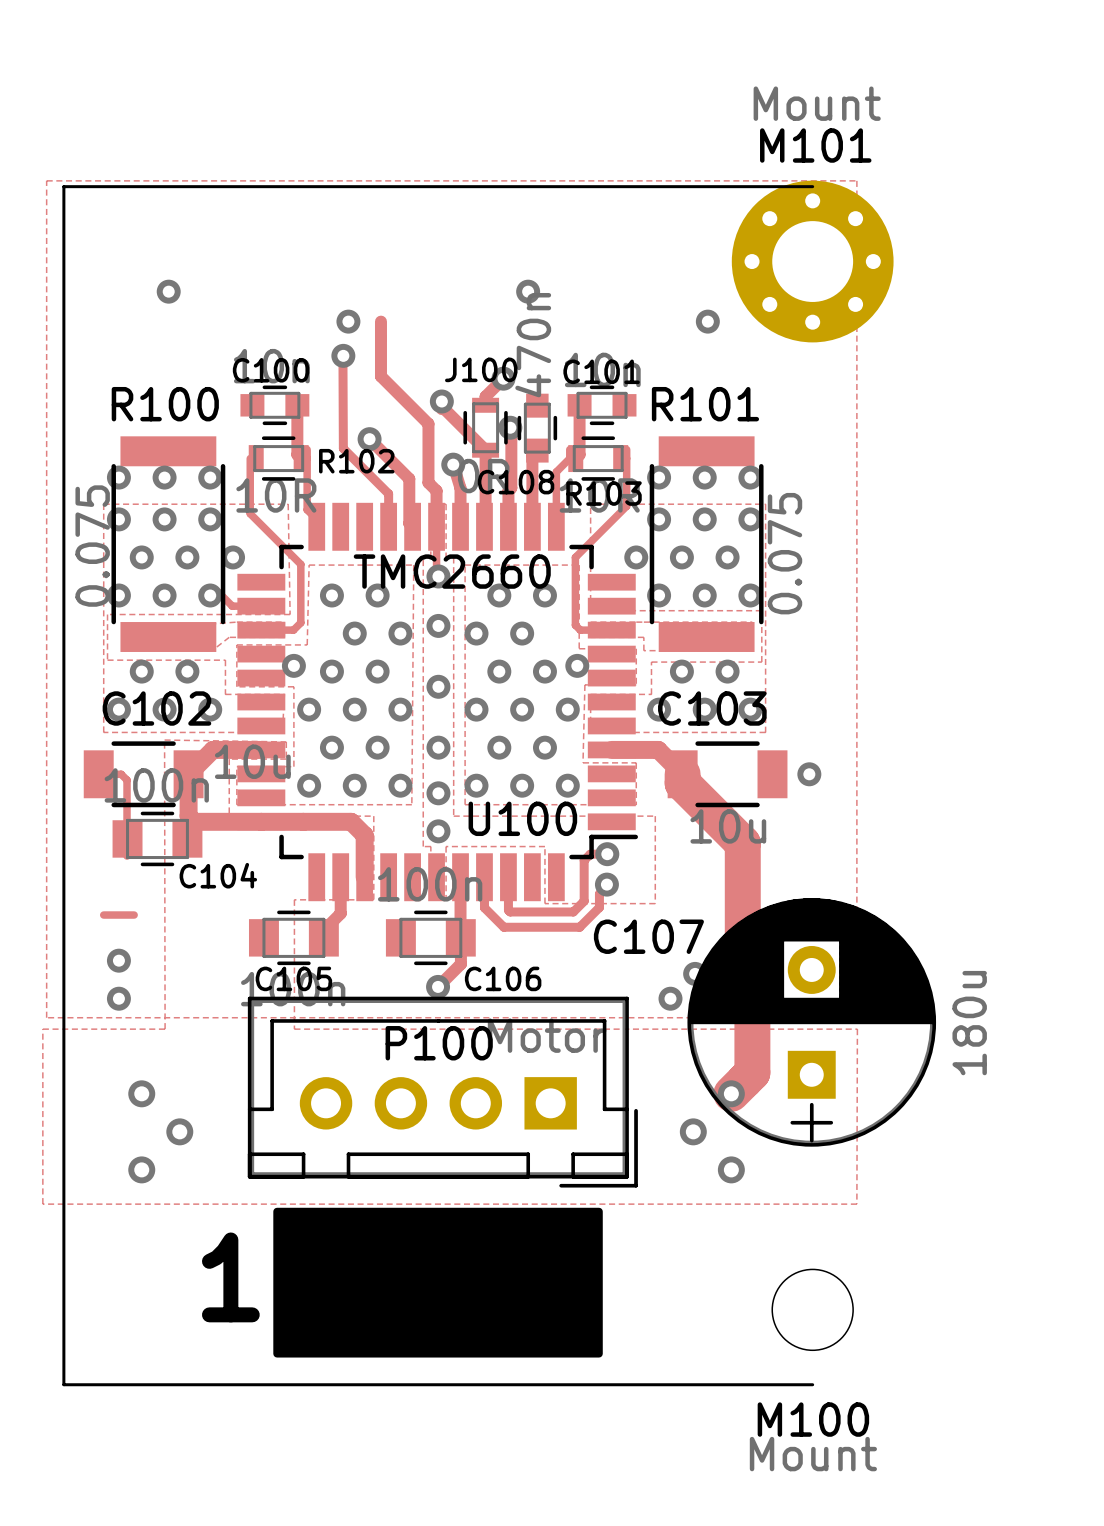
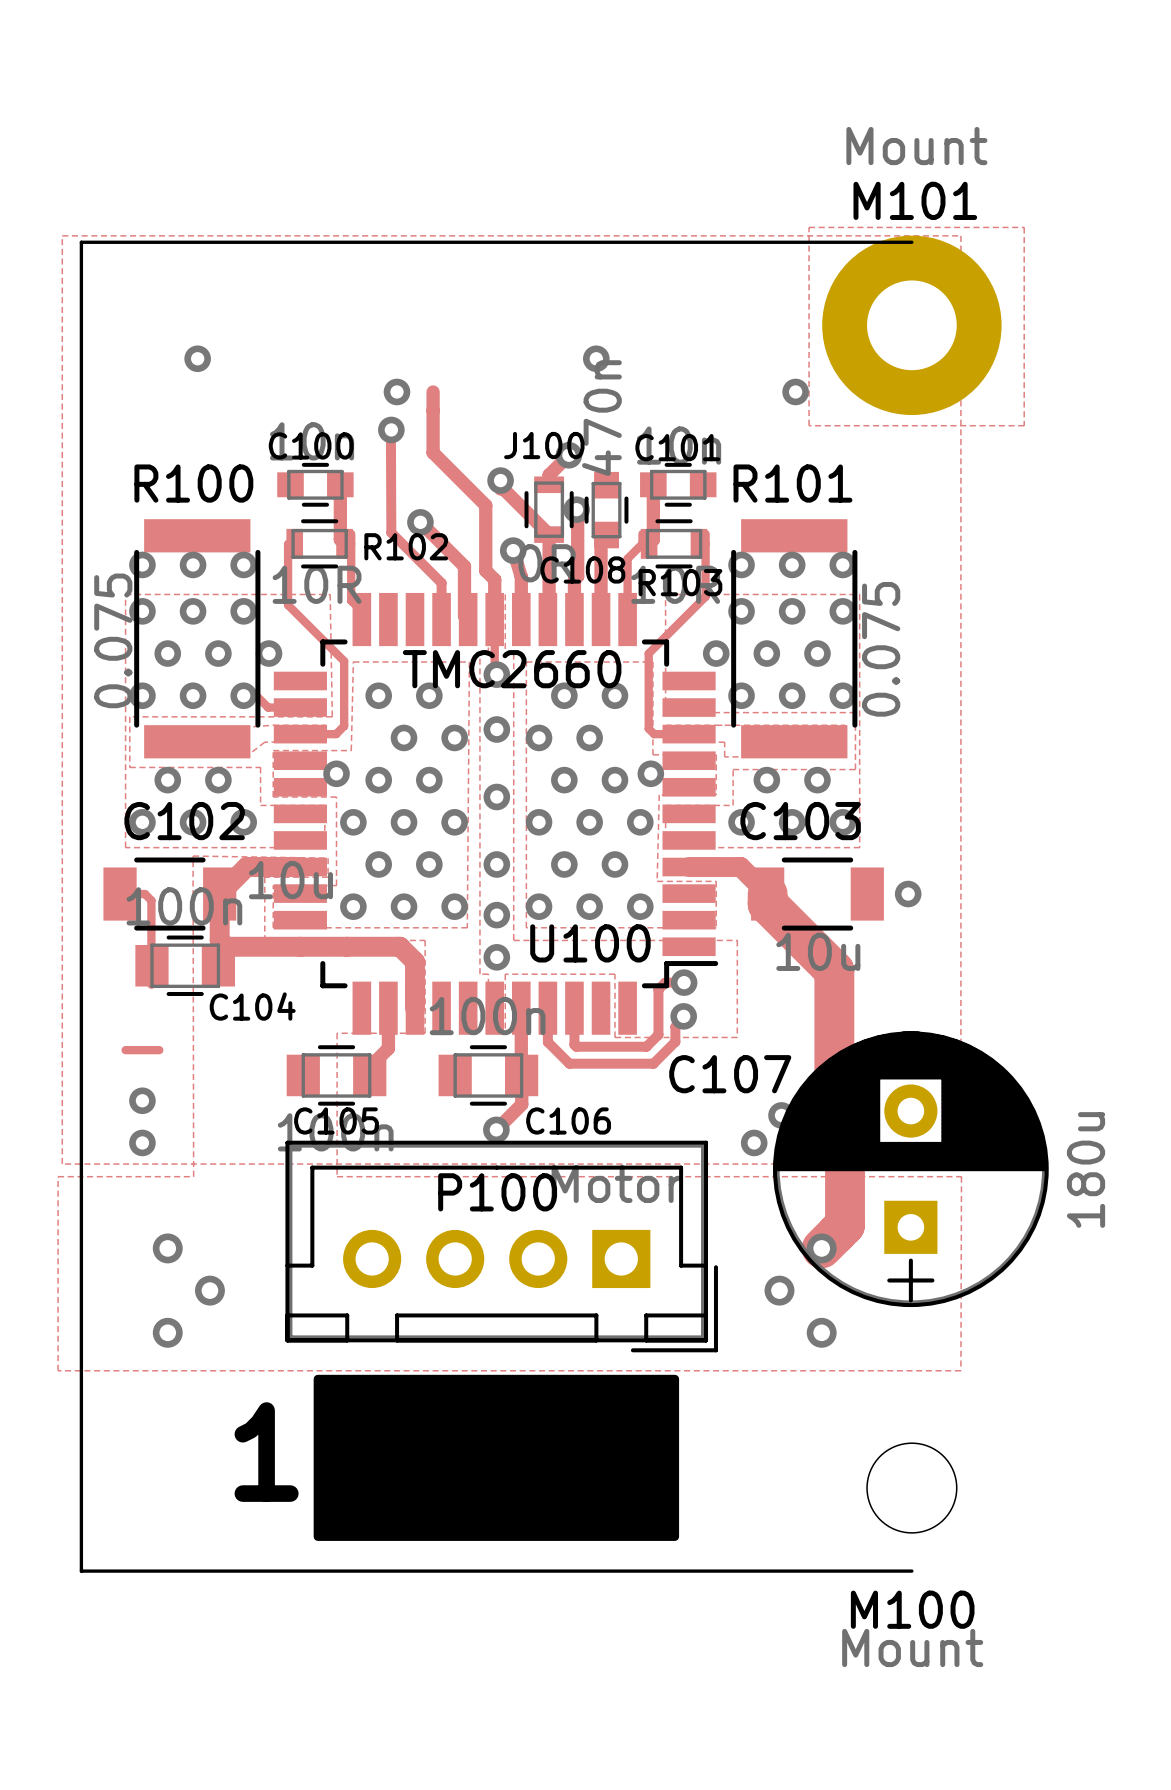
zone outline: none -> (809, 227) (1024, 227) (1024, 425) (809, 425) (809, 227)
M101 footprint: [731, 180, 894, 343] -> [822, 235, 1002, 416]

